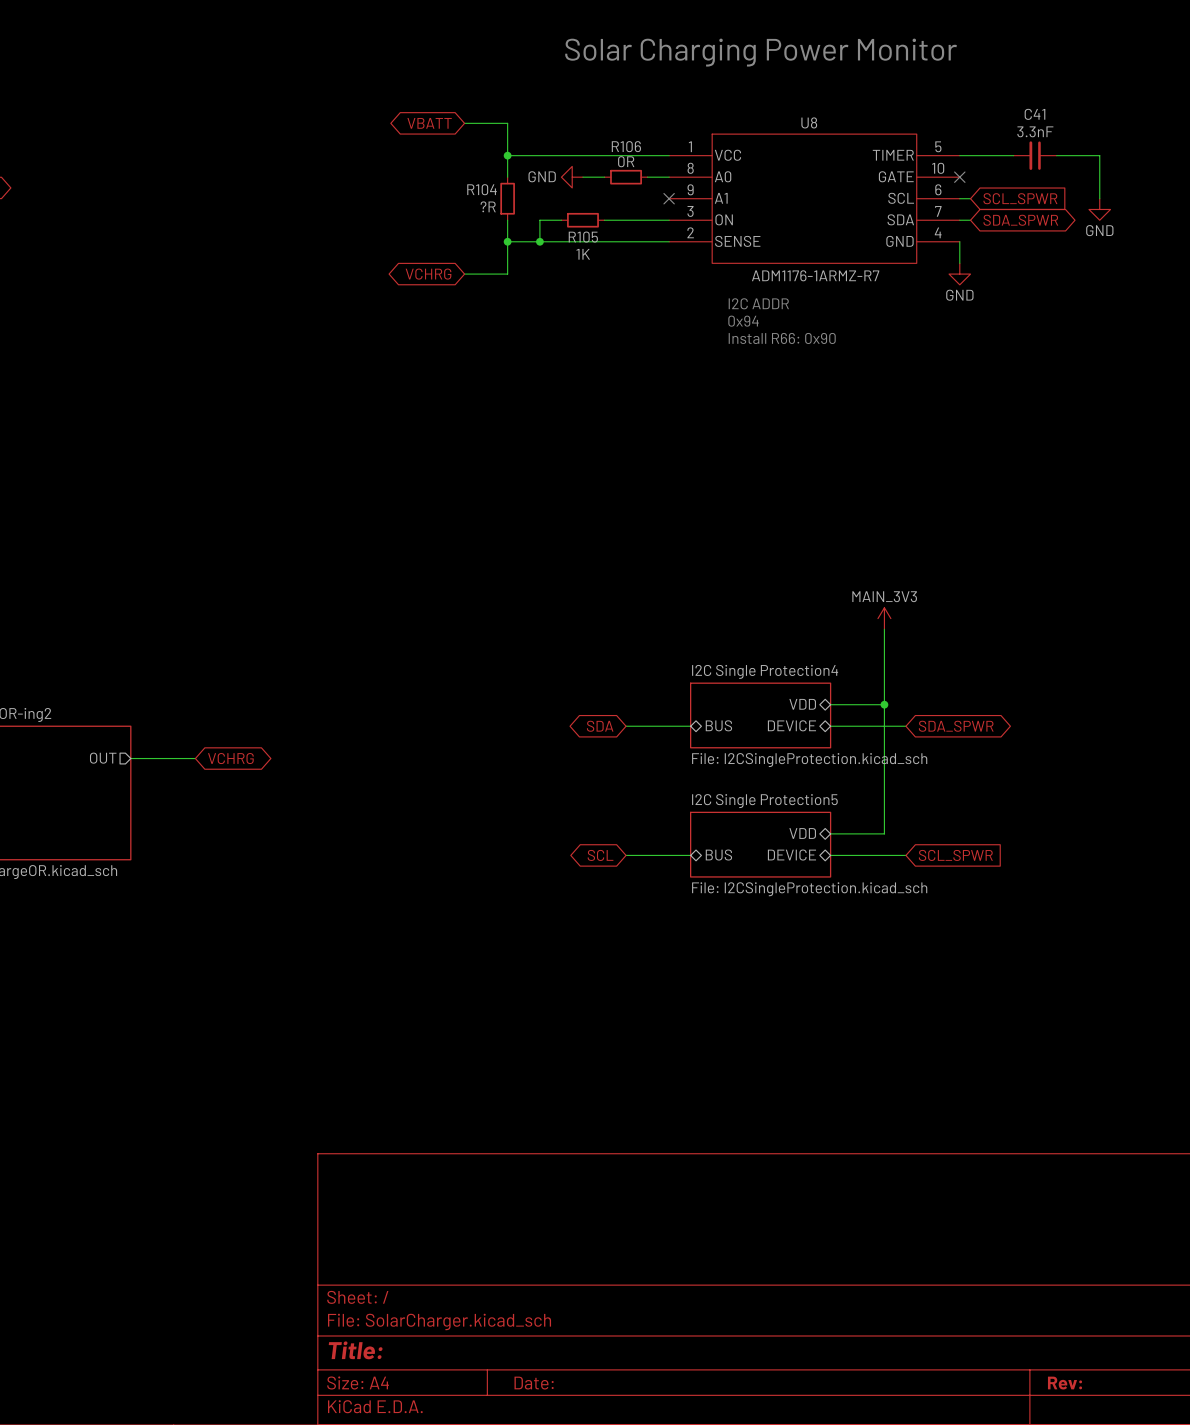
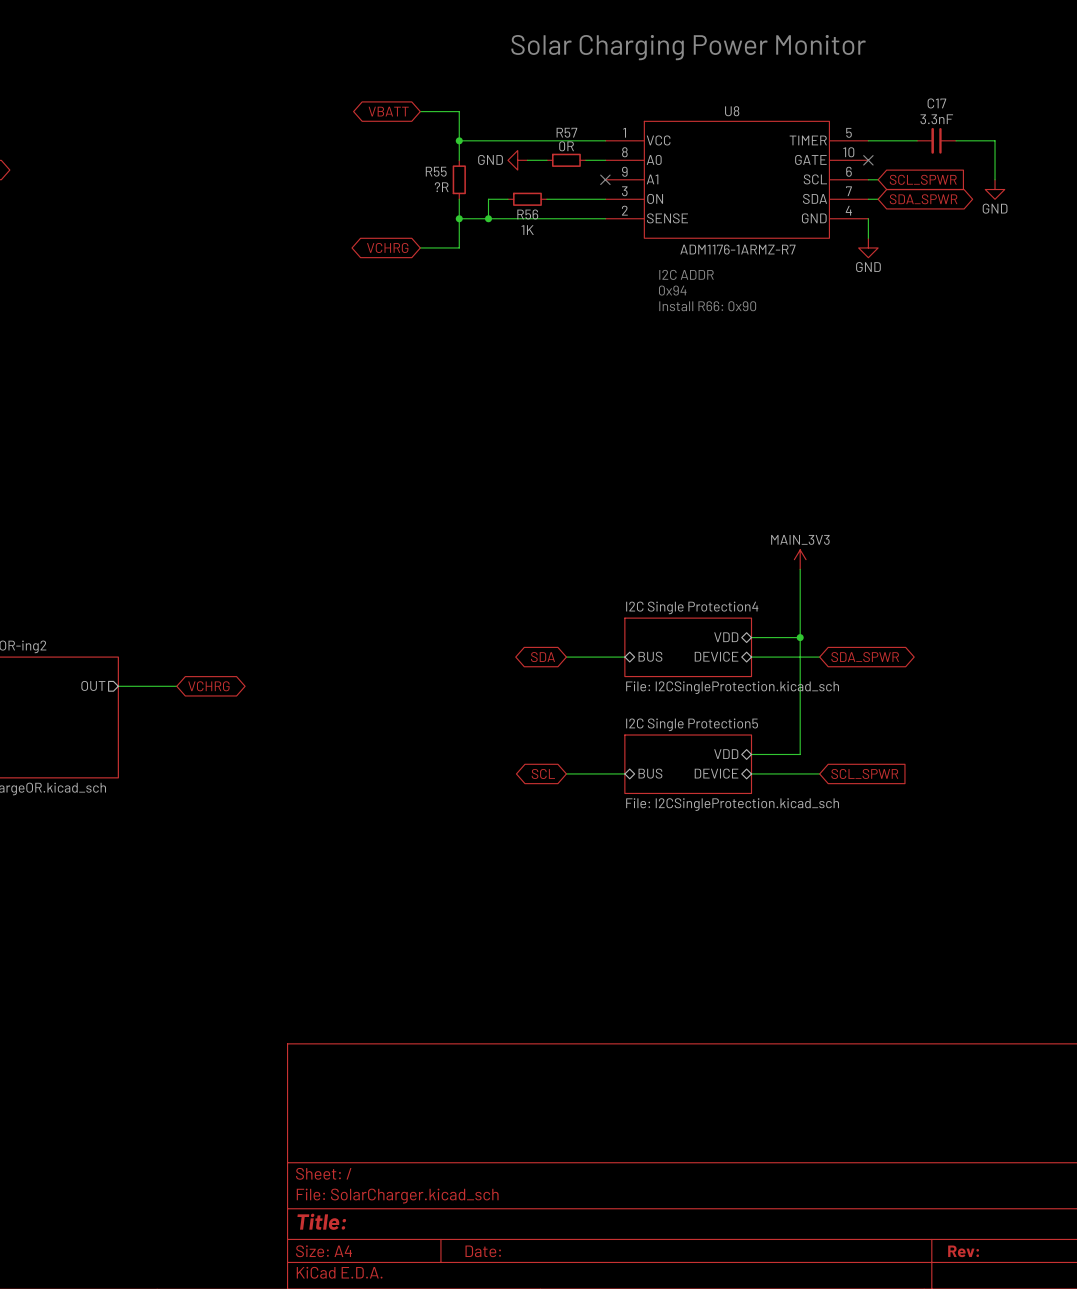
C41 name: C41 (1034, 114) -> C17 (936, 103)
R106 name: R106 (626, 146) -> R57 (566, 132)
R104 name: R104 (482, 189) -> R55 (436, 171)
R105 name: R105 (583, 237) -> R56 (527, 214)

